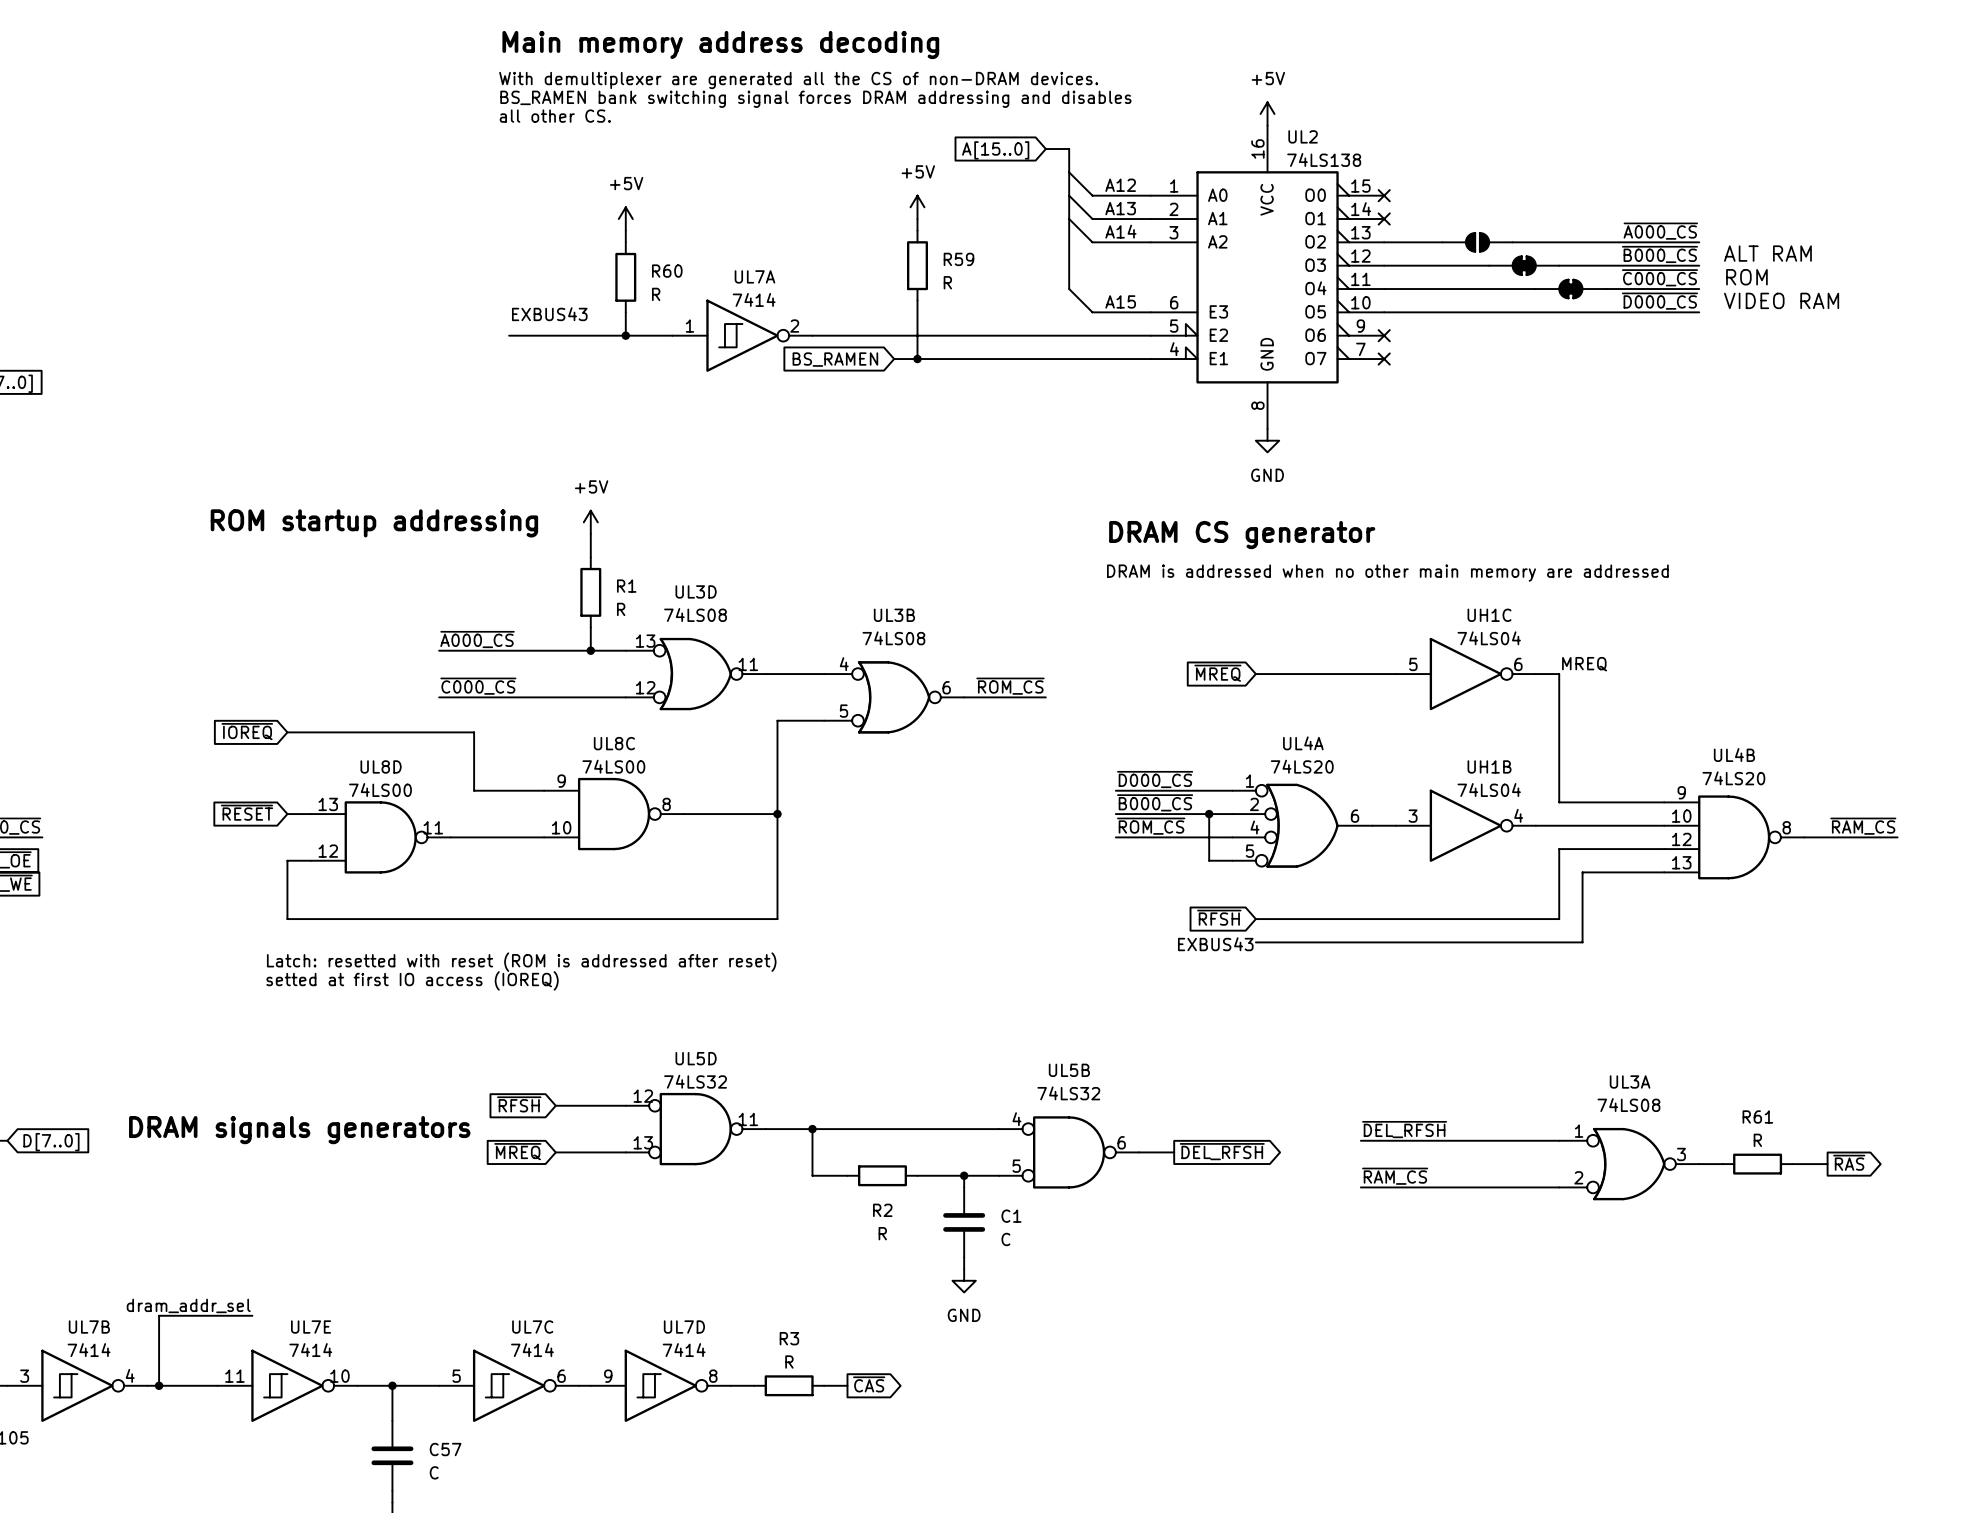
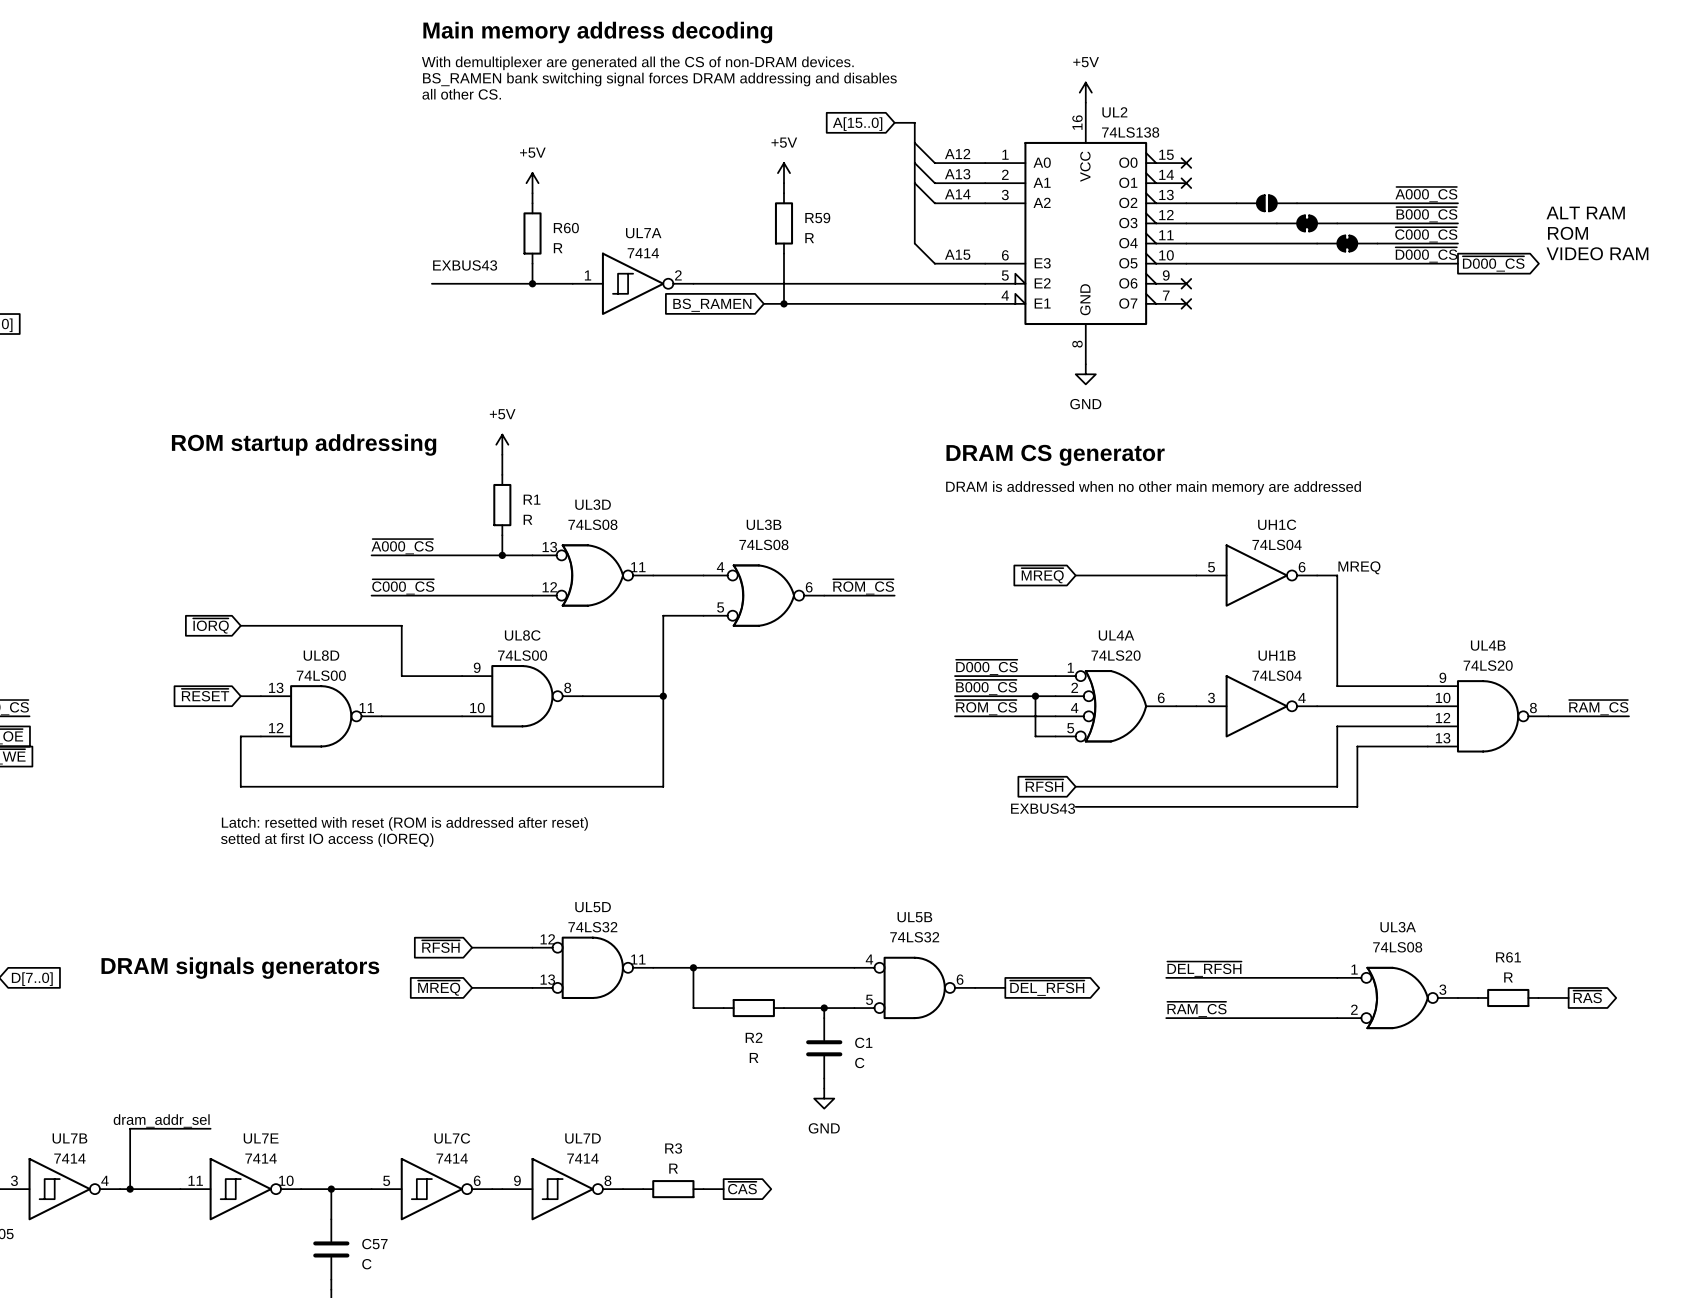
text position: ALT RAM (1767, 253) -> ALT RAM (1585, 212)
text position: ROM (1746, 277) -> ROM (1567, 233)
text position: VIDEO RAM (1781, 300) -> VIDEO RAM (1597, 253)
global label: none -> ~{D000_CS} (1493, 263)
global label: ~{IOREQ} (247, 731) -> ~{IORQ} (210, 626)

